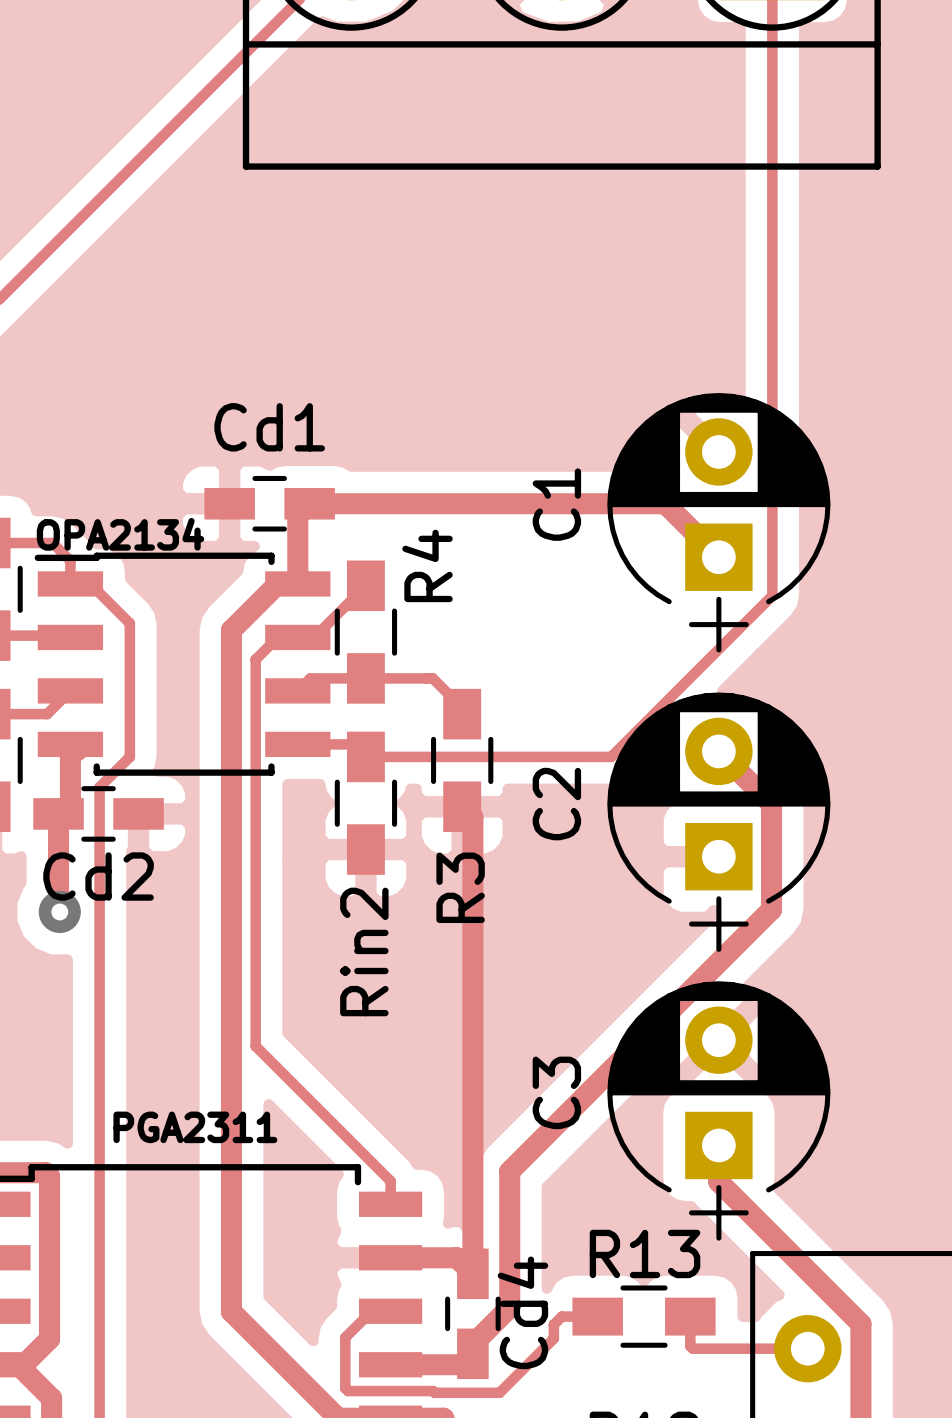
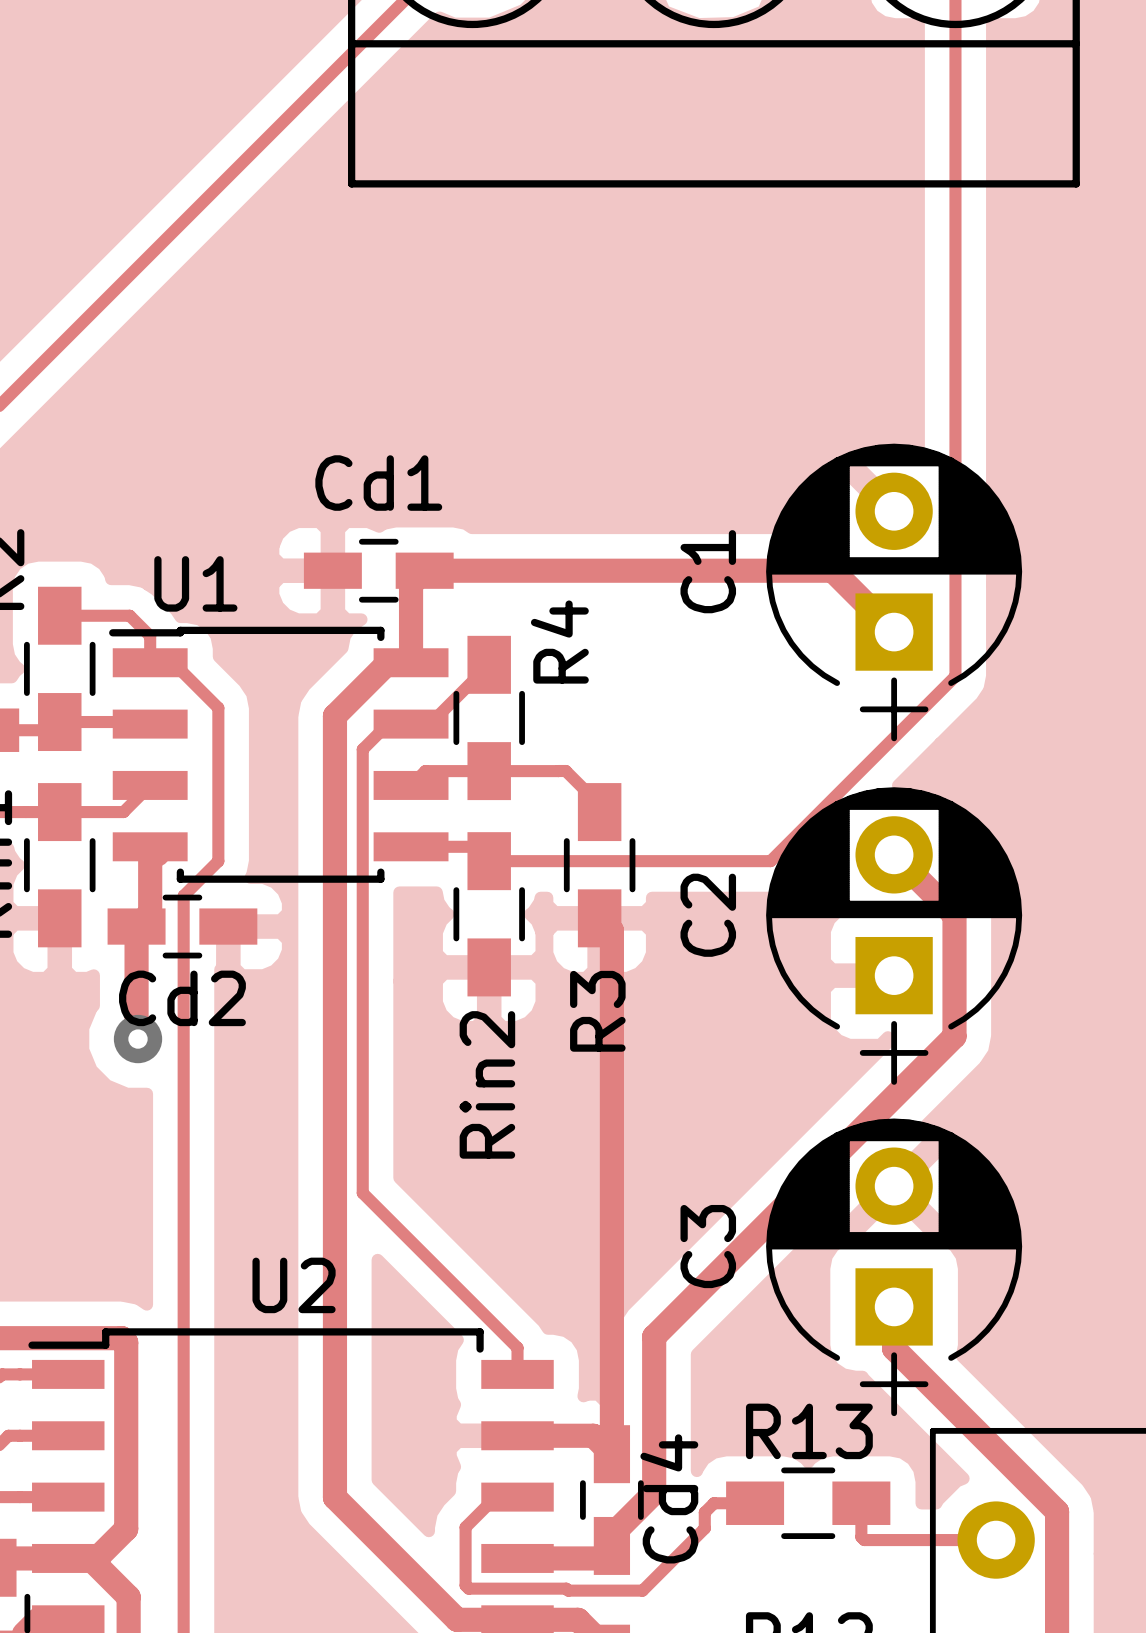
OPA2134 name: OPA2134 (120, 534) -> U1 (195, 583)
PGA2311 name: PGA2311 (195, 1127) -> U2 (294, 1285)

